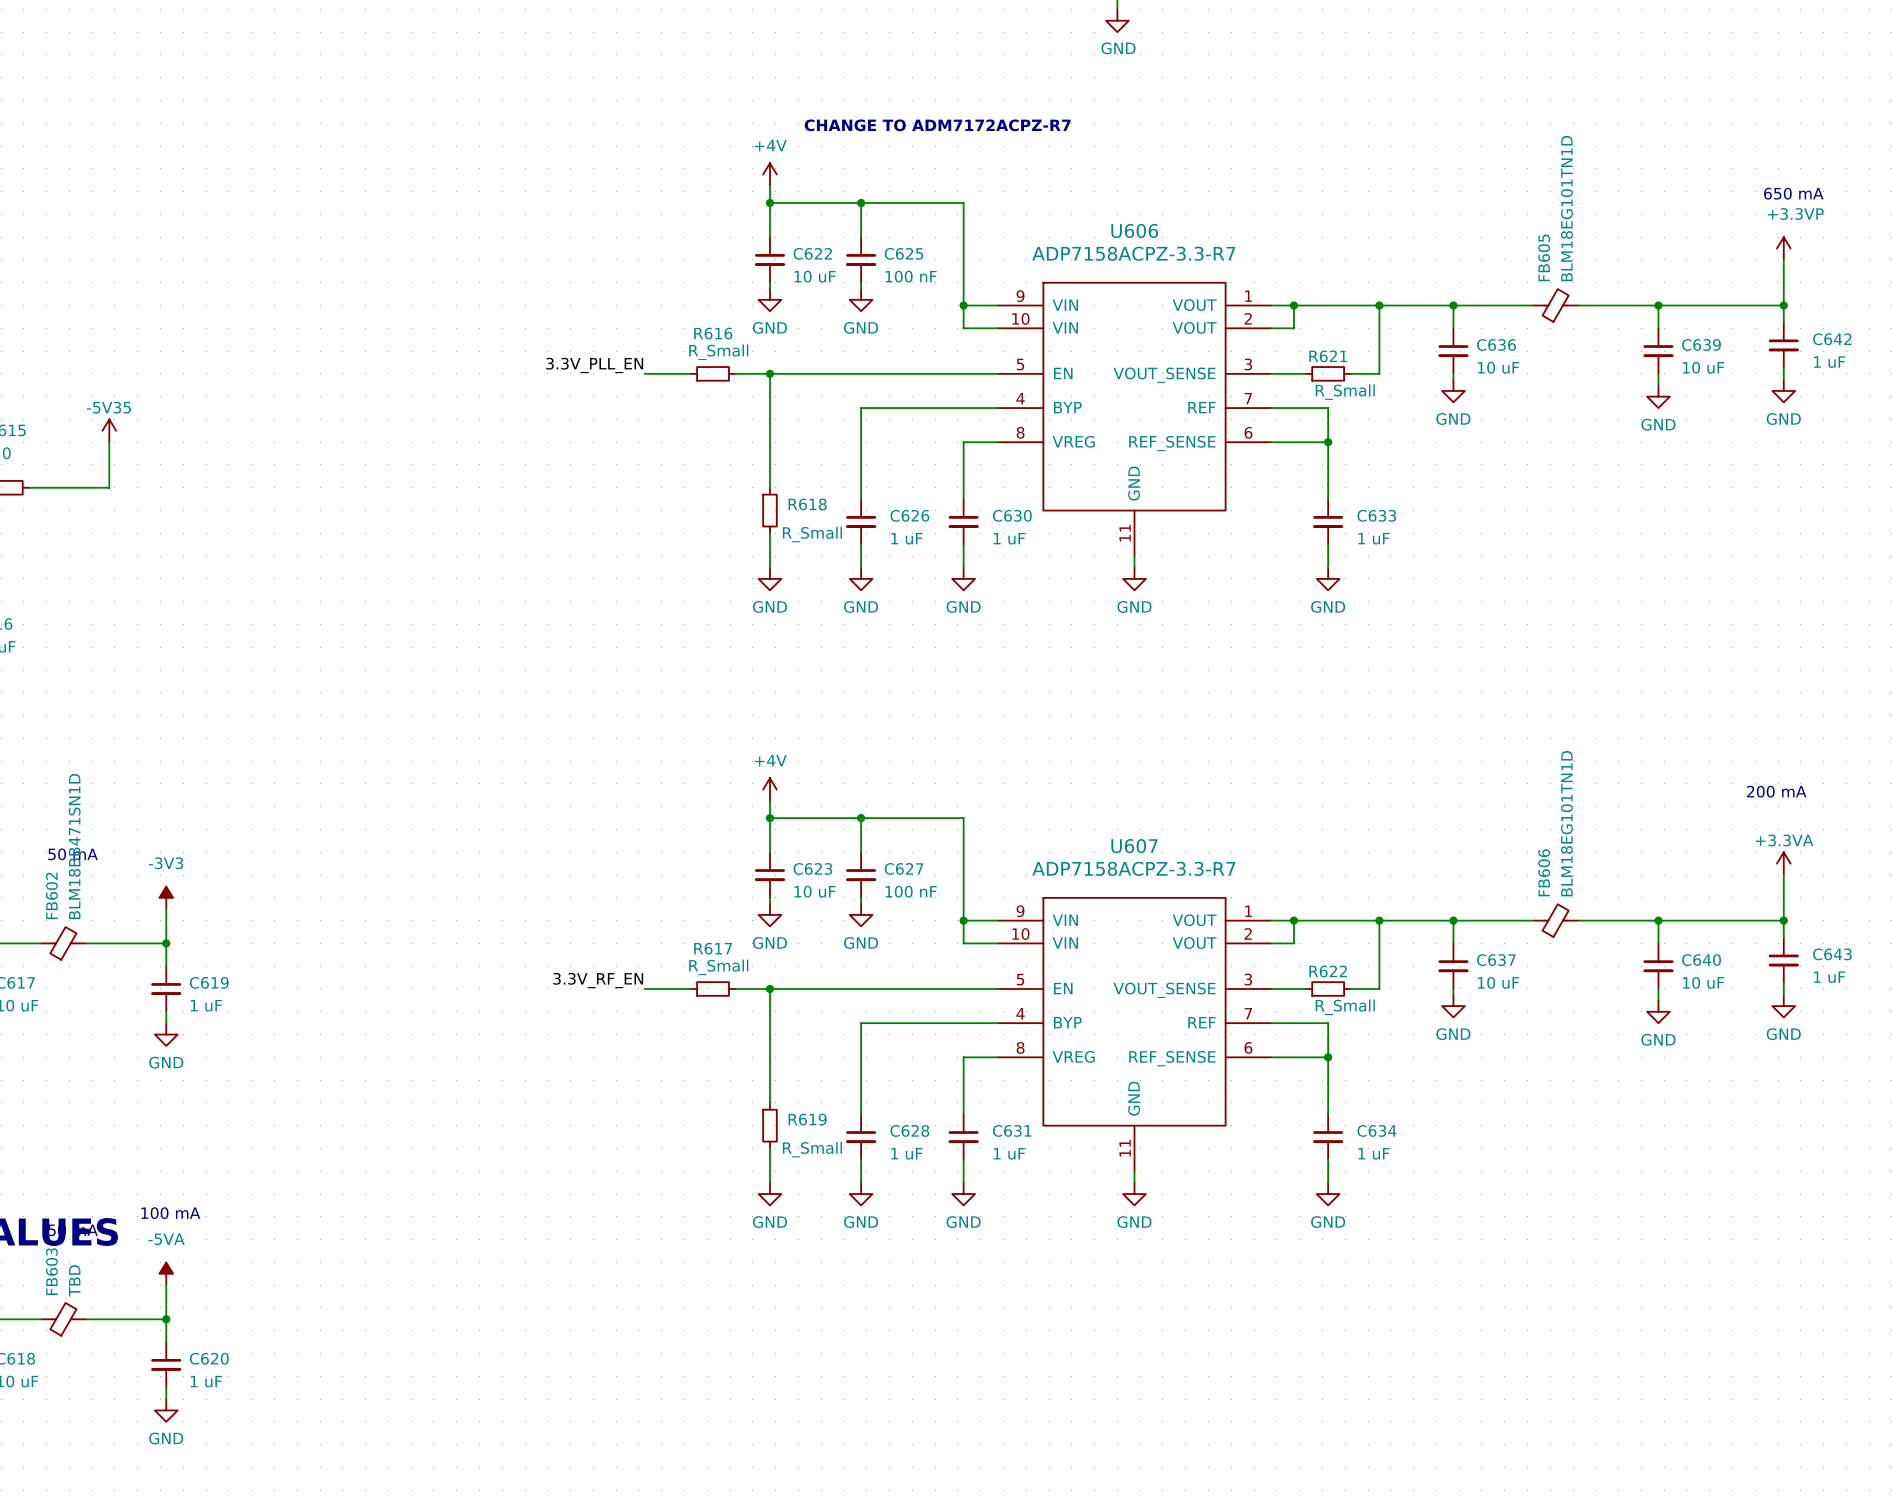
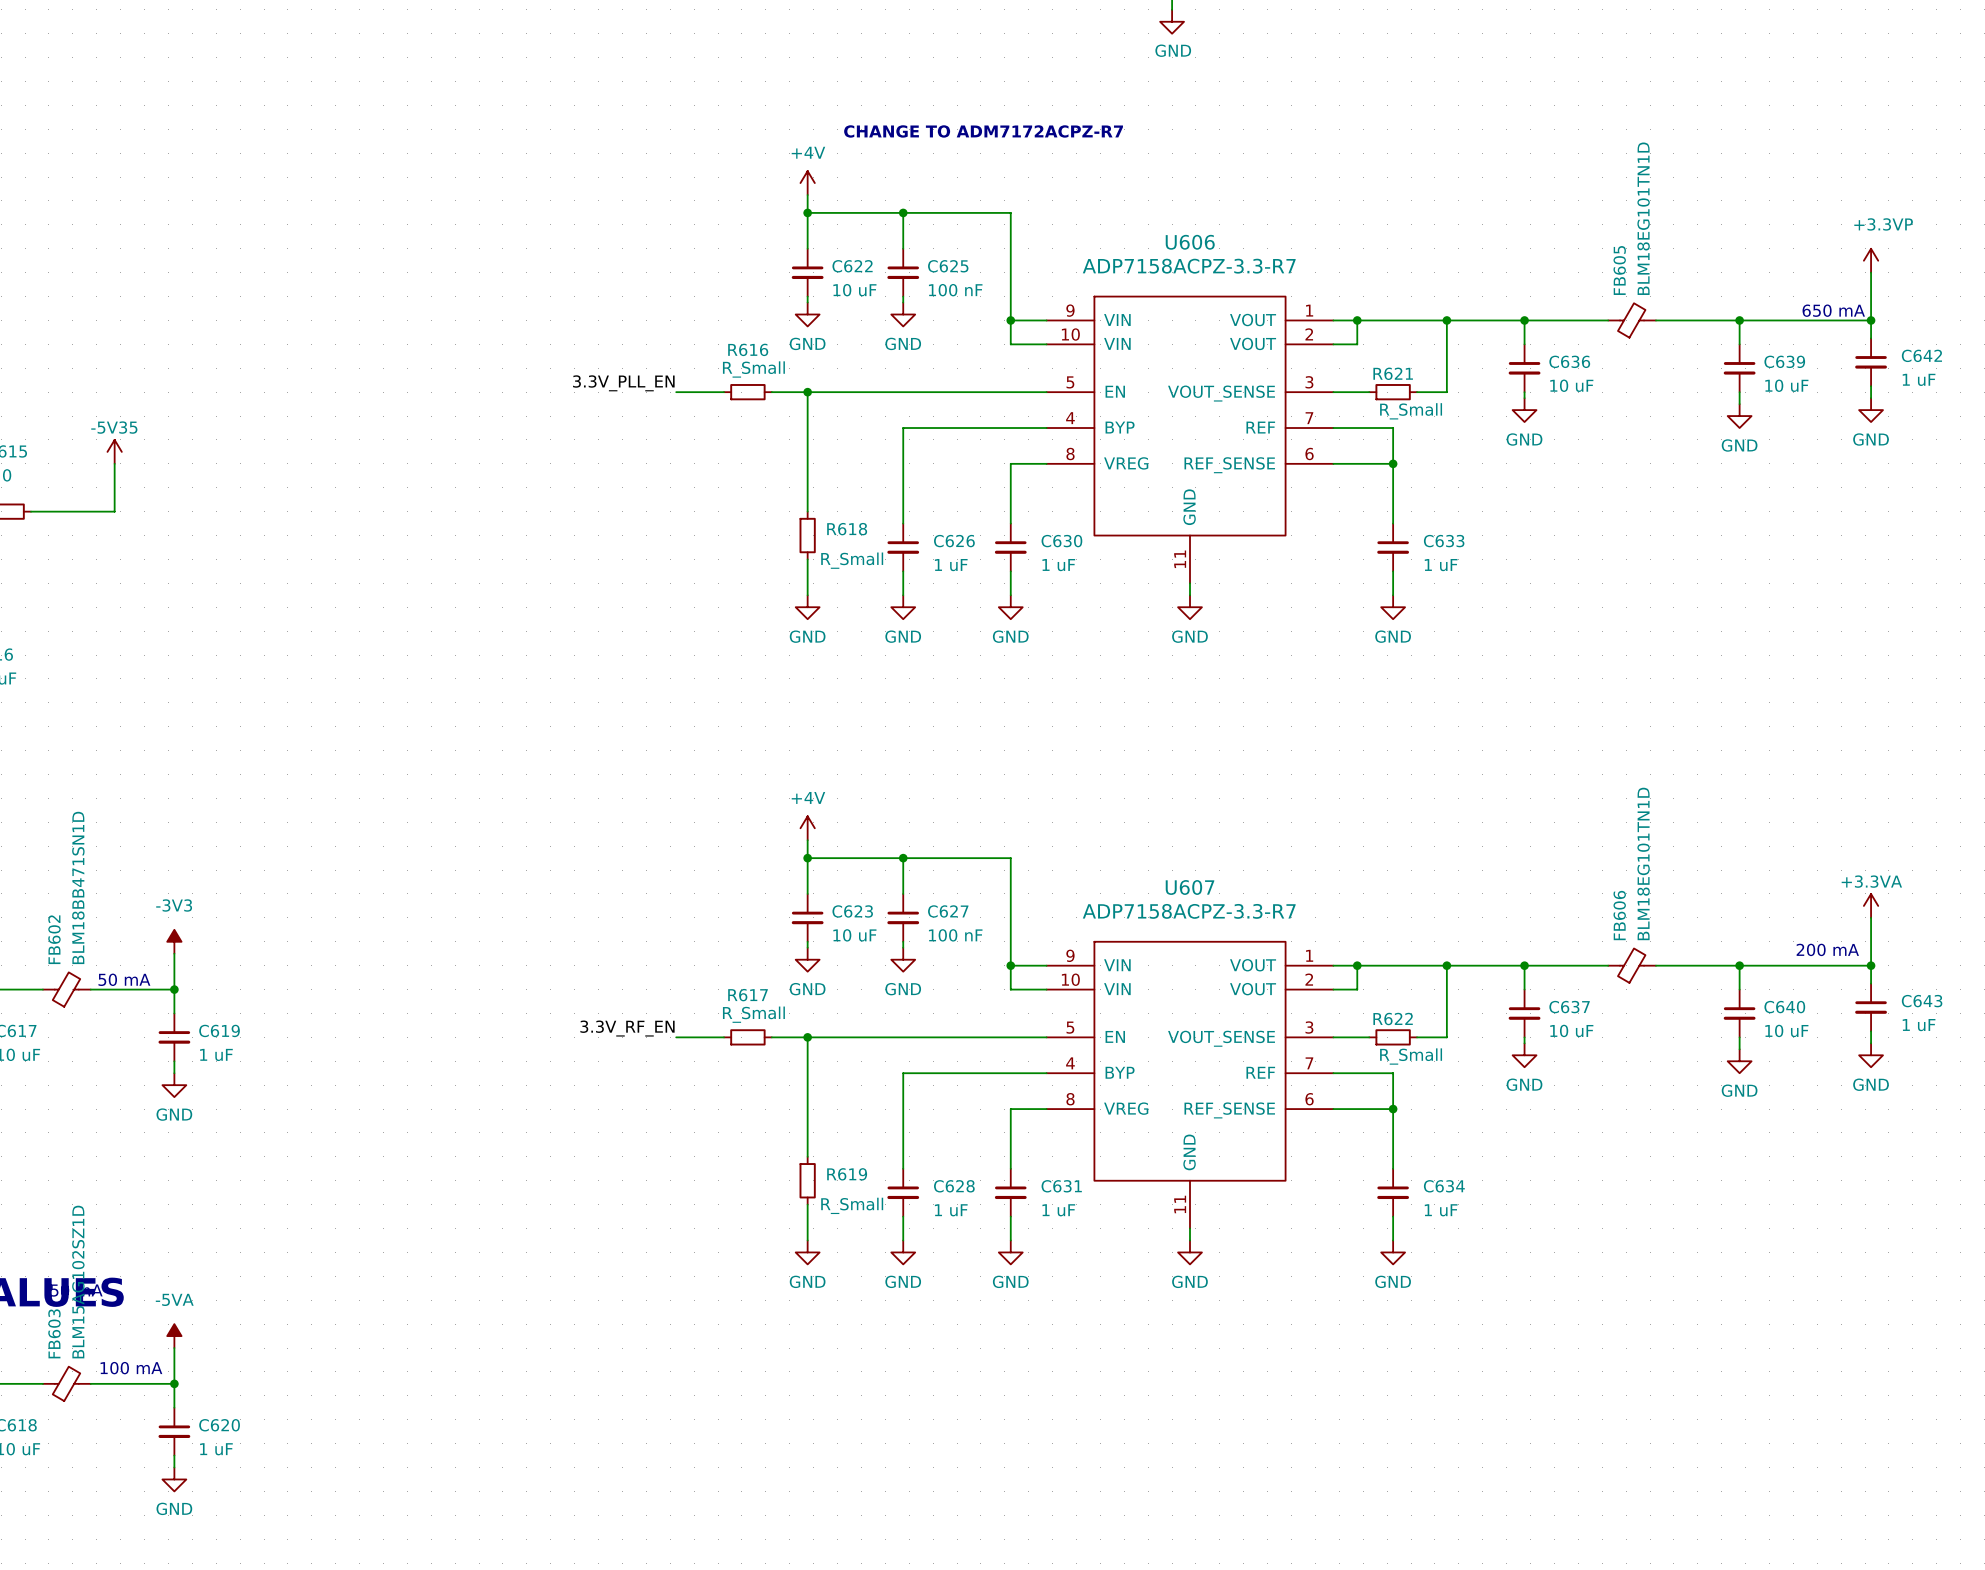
text position: 650 mA (1793, 193) -> 650 mA (1833, 310)
text position: 200 mA (1776, 791) -> 200 mA (1827, 949)
text position: 50 mA (73, 854) -> 50 mA (124, 979)
text position: 100 mA (170, 1213) -> 100 mA (131, 1368)
FB603 value: TBD (74, 1280) -> BLM15AG102SZ1D (78, 1282)

